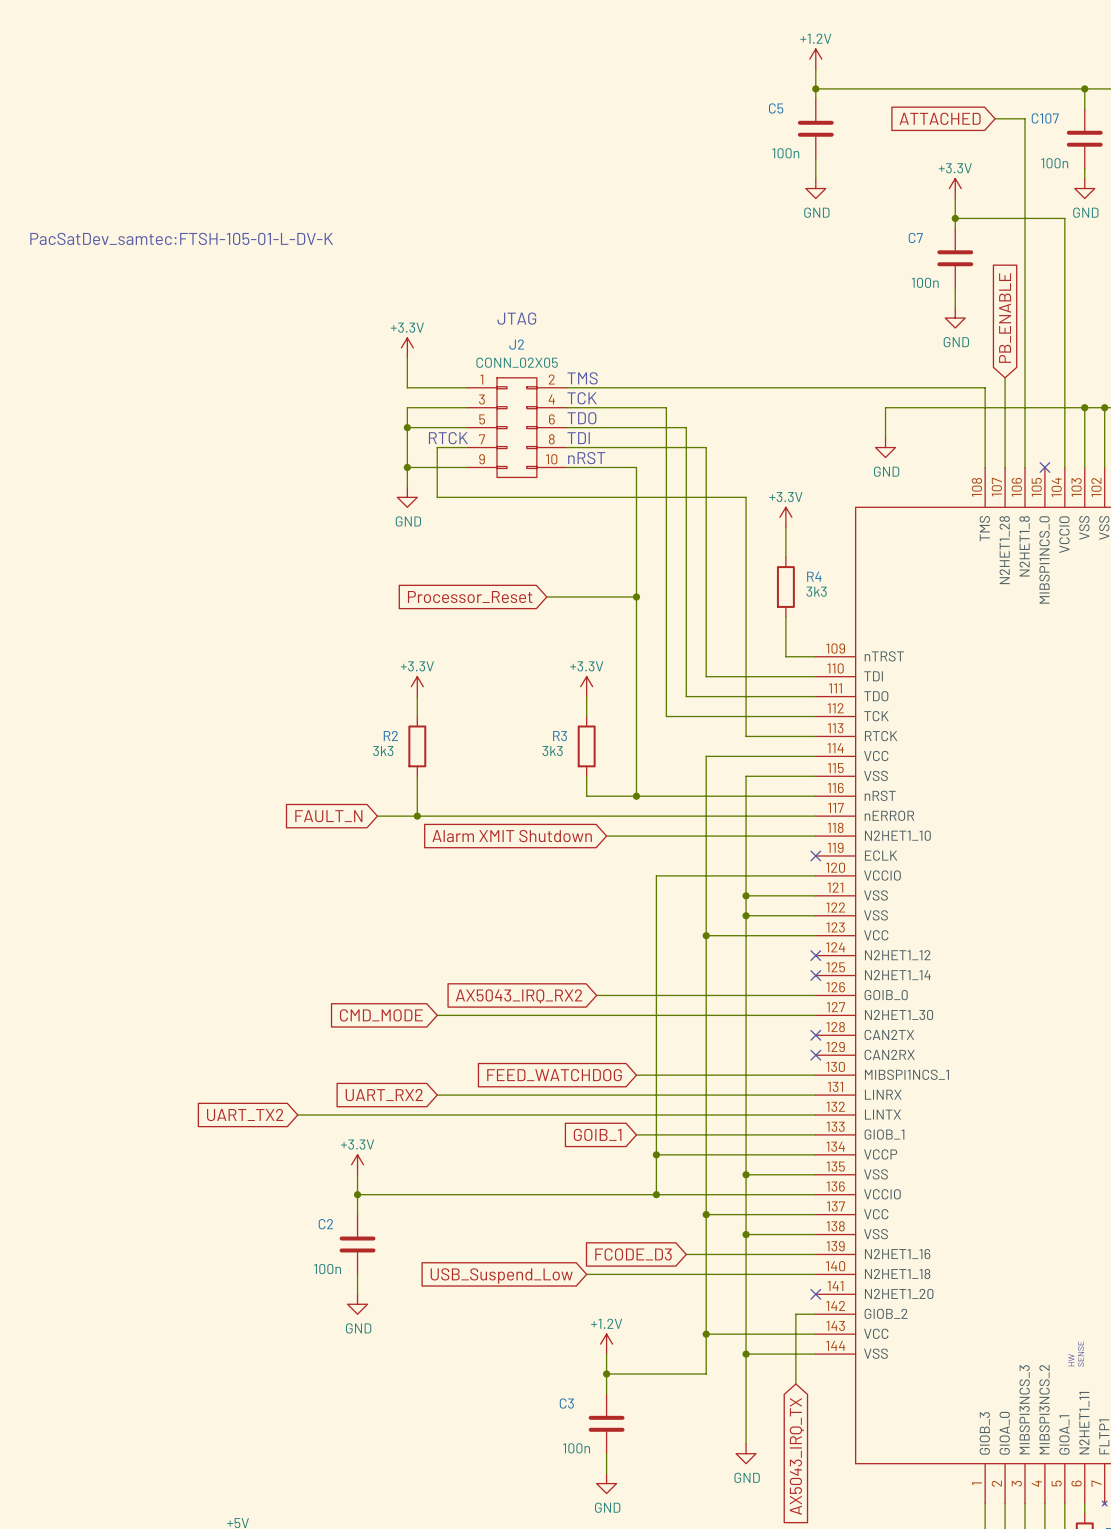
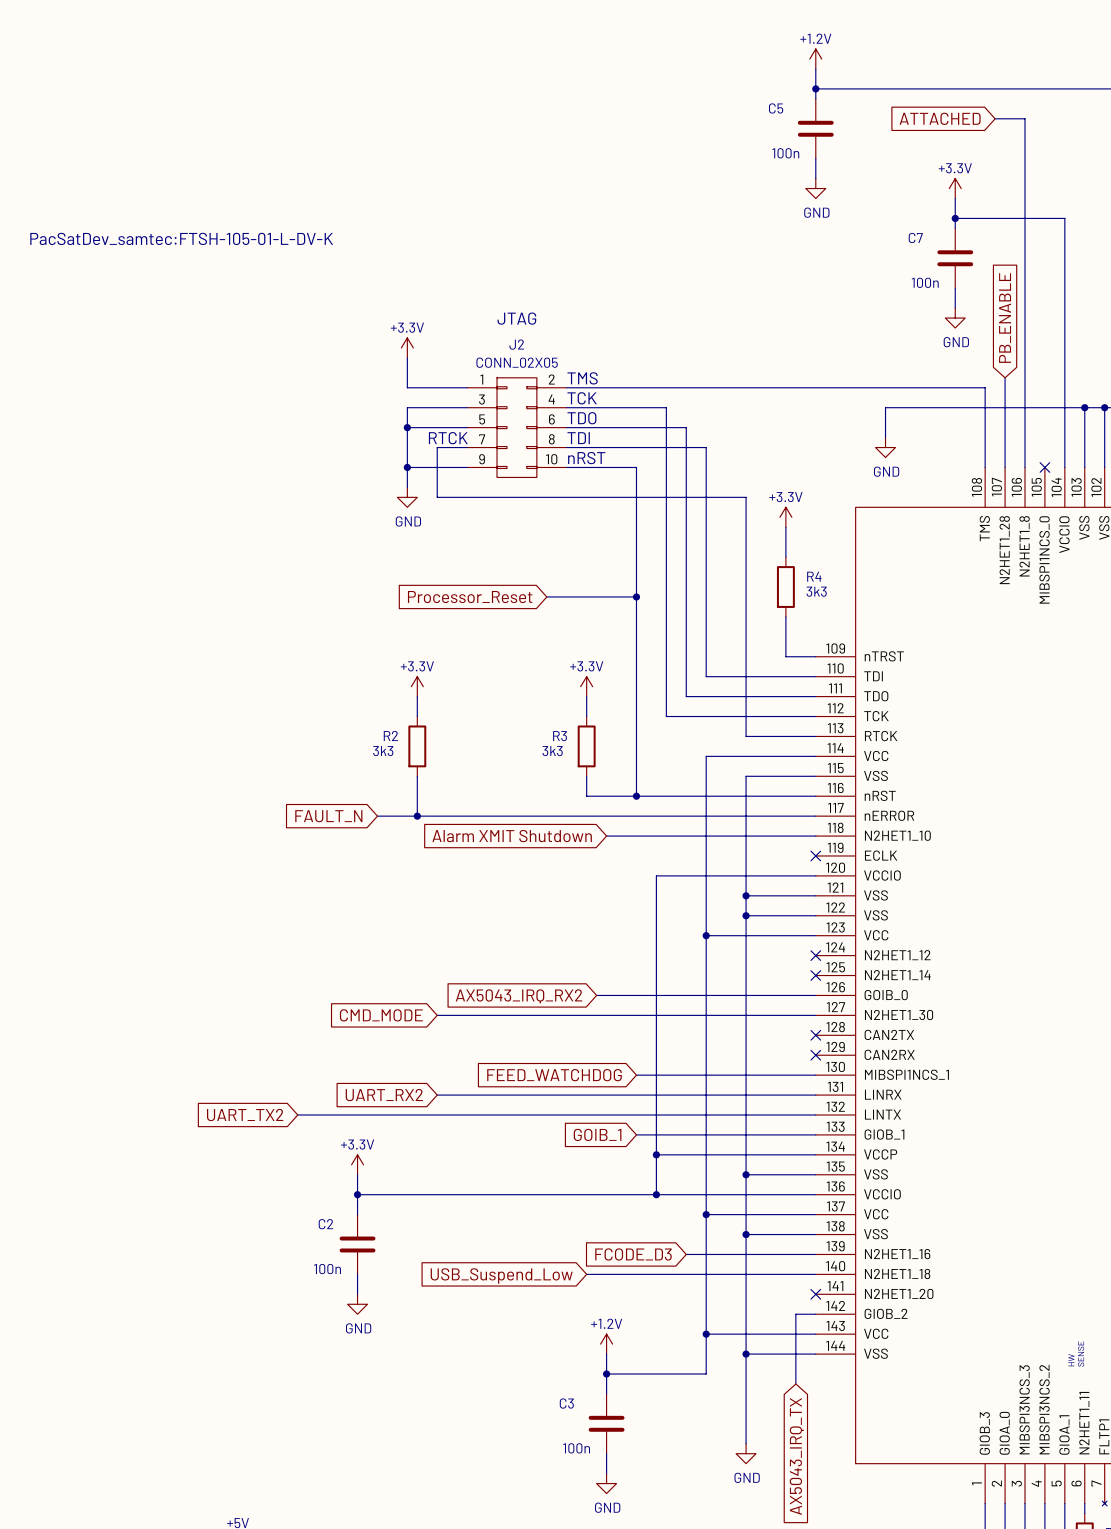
wire: (1084, 88) (1084, 108) -> none
junction: (1084, 88) -> none
C107: 100n (1084, 138) -> none
wire: (1084, 168) (1084, 178) -> none
power symbol: GND (1084, 188) -> none

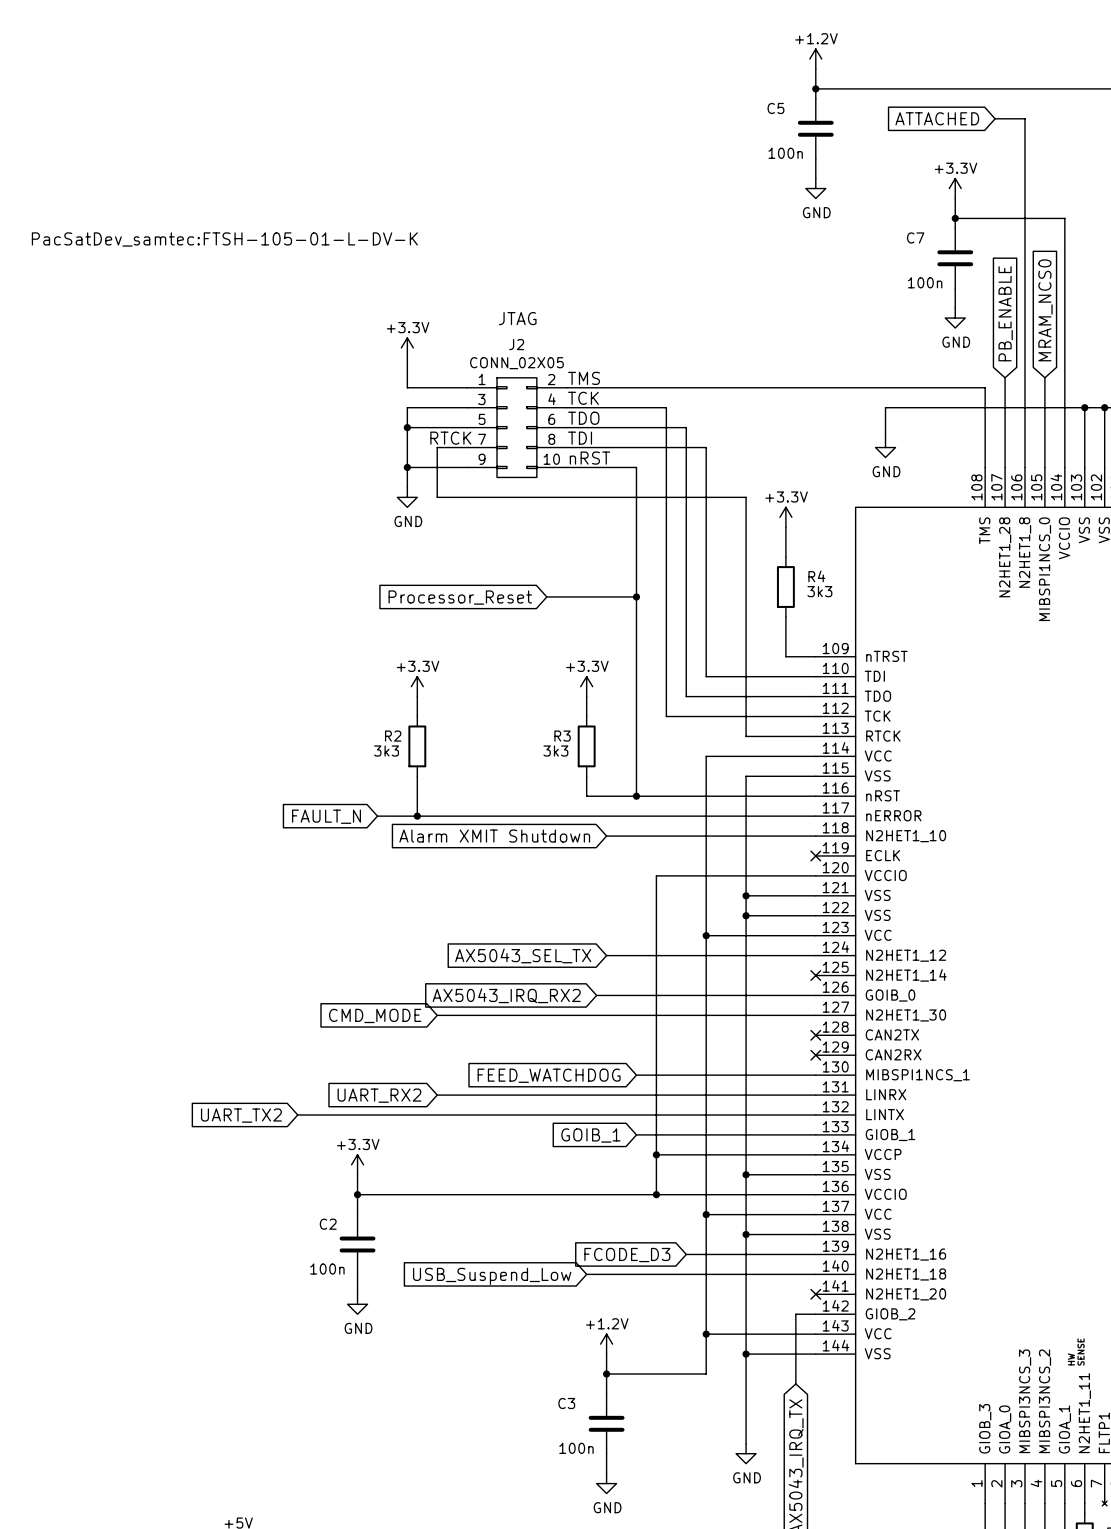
global label: none -> MRAM_NCS0 (1045, 310)
wire: none -> (1044, 377) (1044, 467)
no-connect mark: (1044, 467) -> none
global label: none -> AX5043_SEL_TX (523, 955)
wire: none -> (606, 955) (815, 955)
no-connect mark: (815, 955) -> none

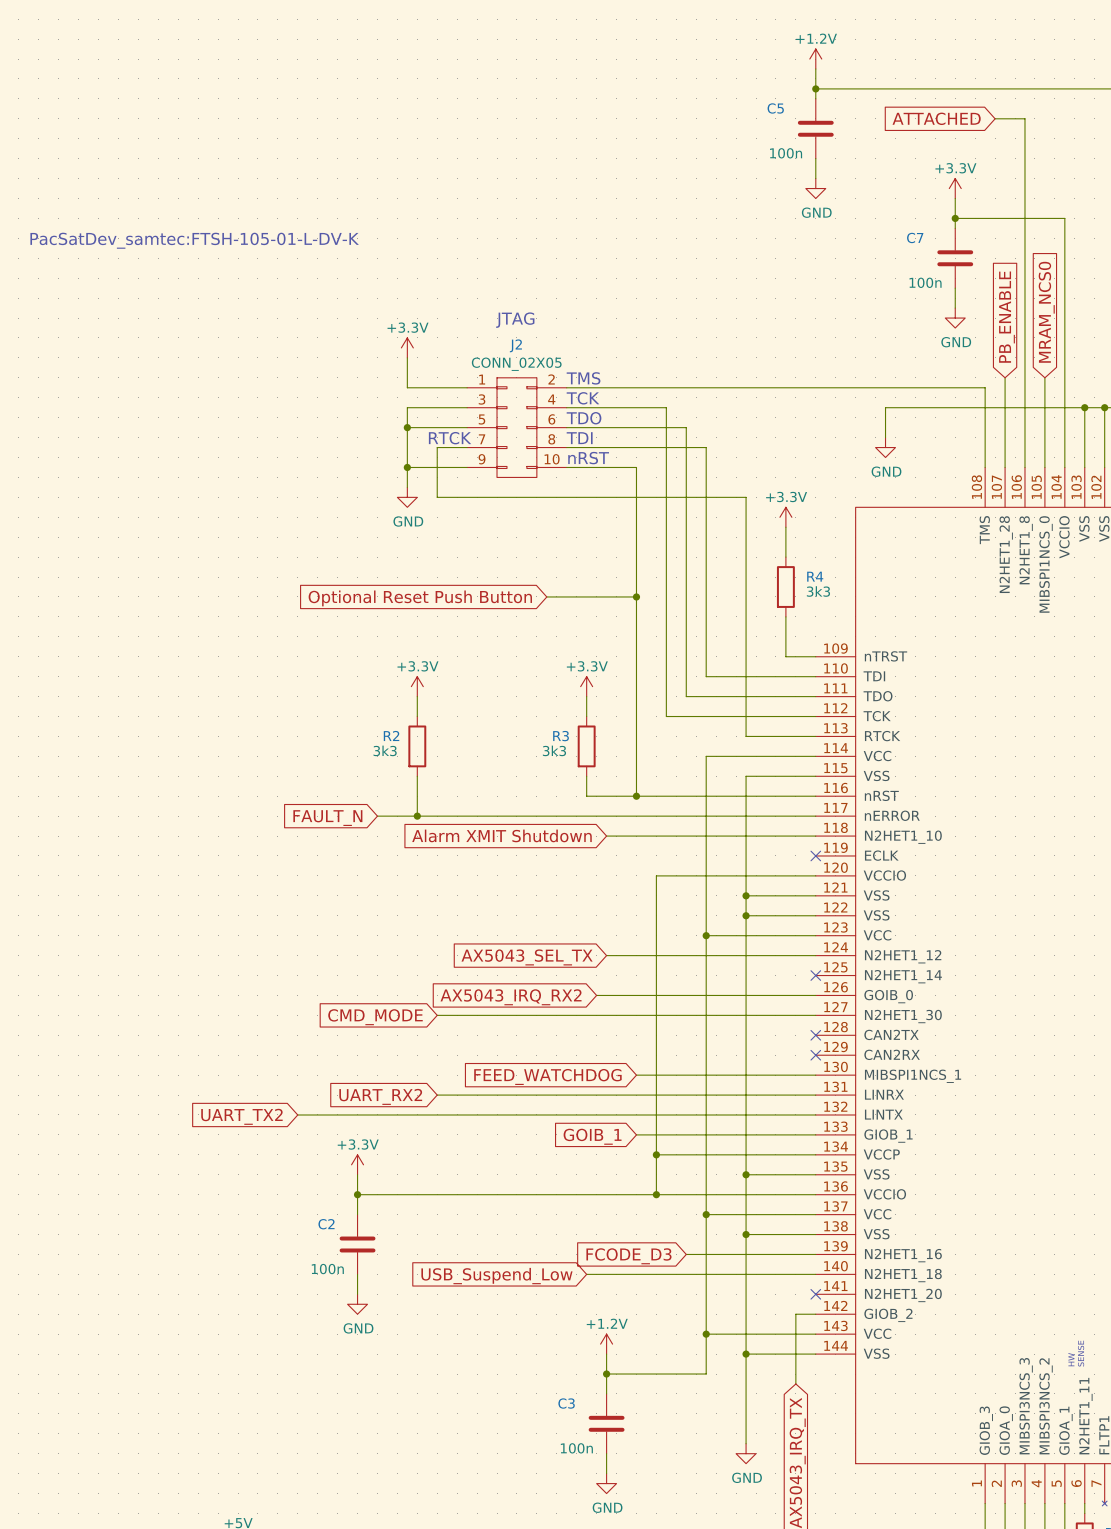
global label: Processor_Reset (460, 597) -> Optional Reset Push Button (420, 598)

